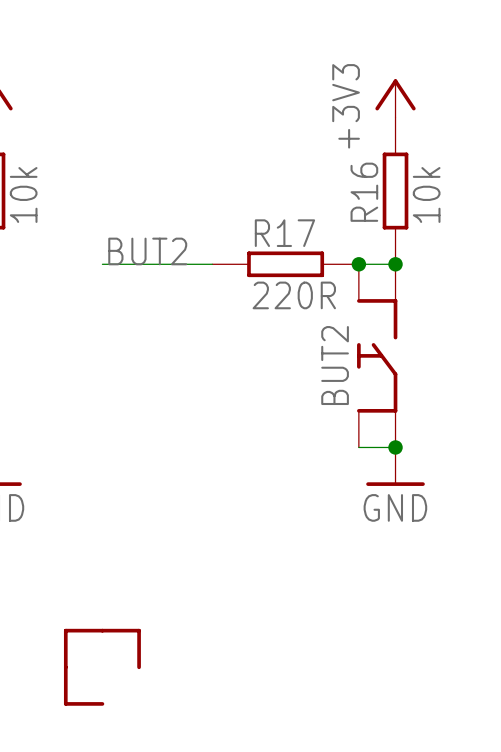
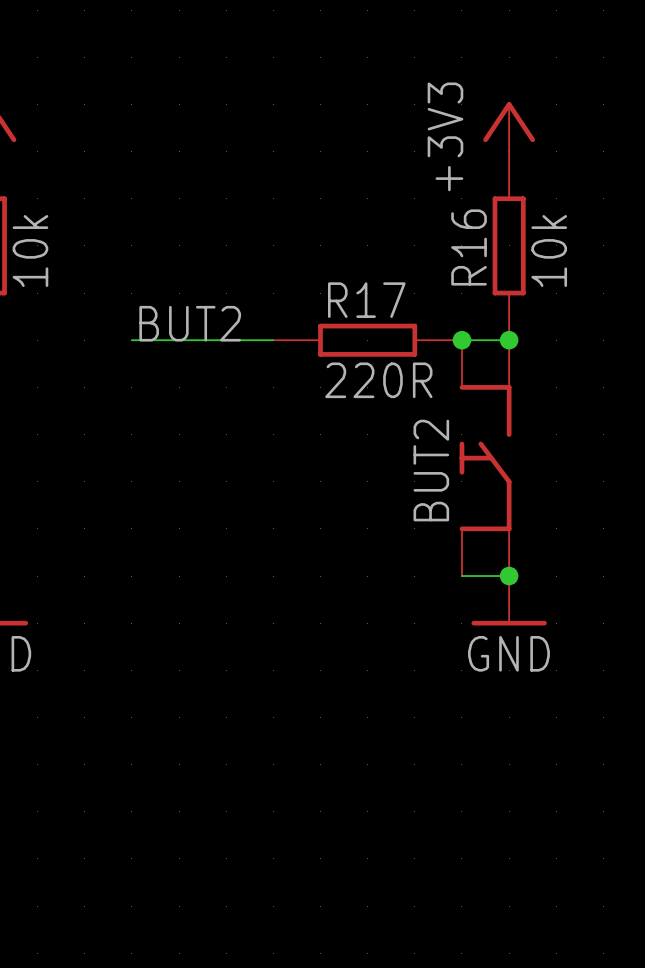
part: (84, 648) -> none
part: (120, 648) -> none
part: (84, 685) -> none

